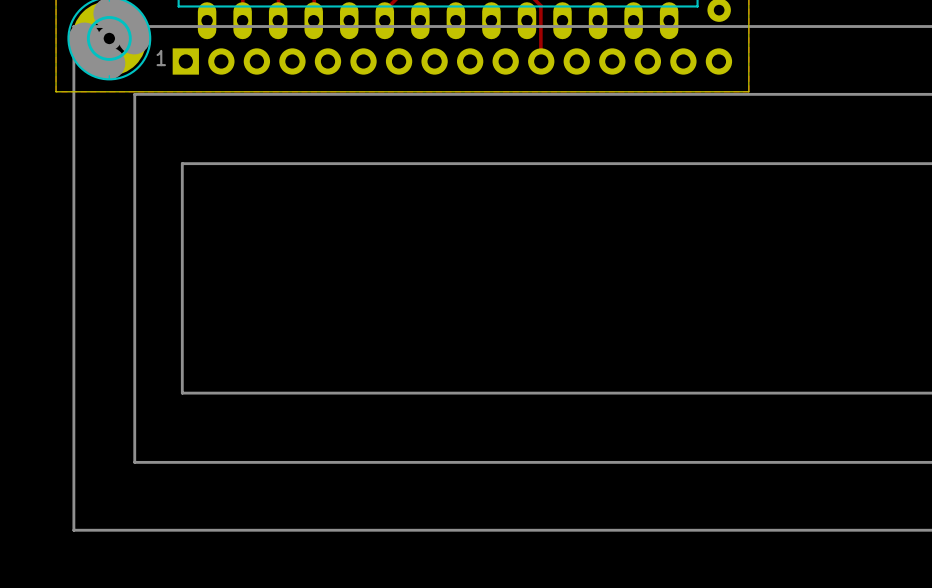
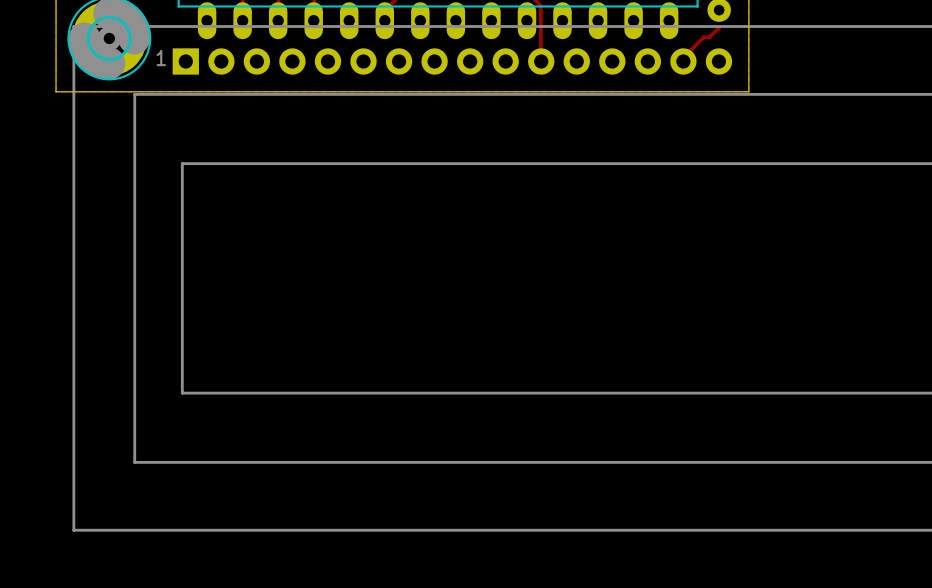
track: none -> (719, 28) (709, 37) (703, 37) (684, 56) (683, 61)

